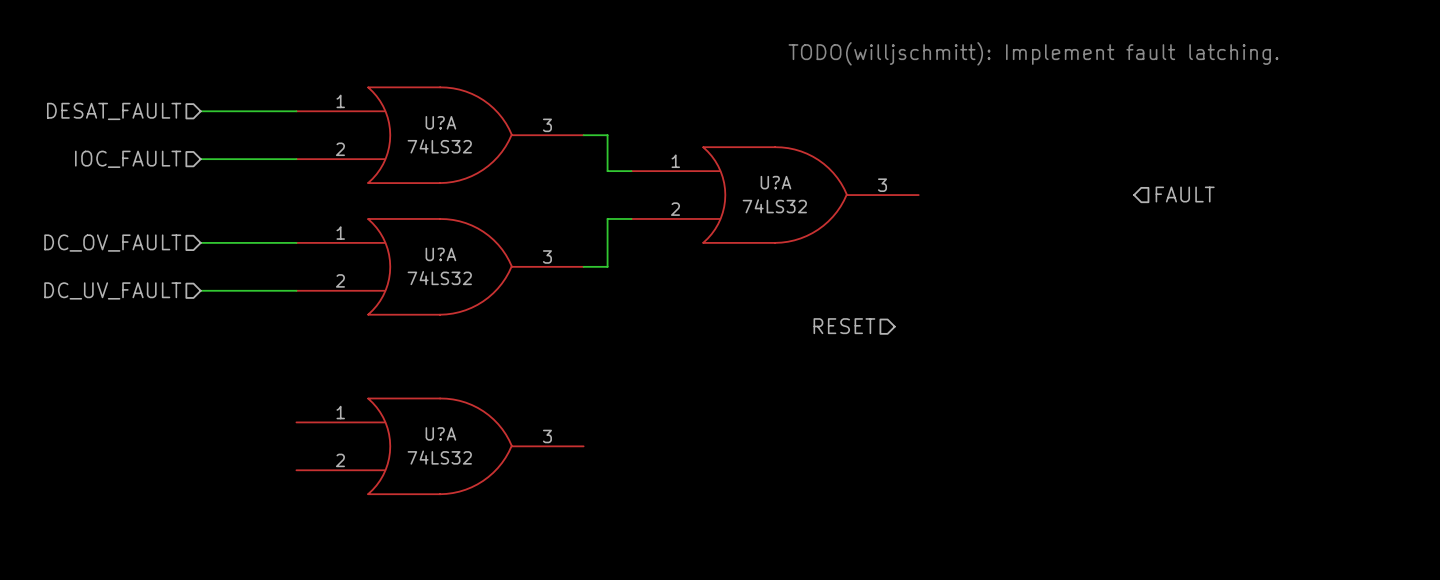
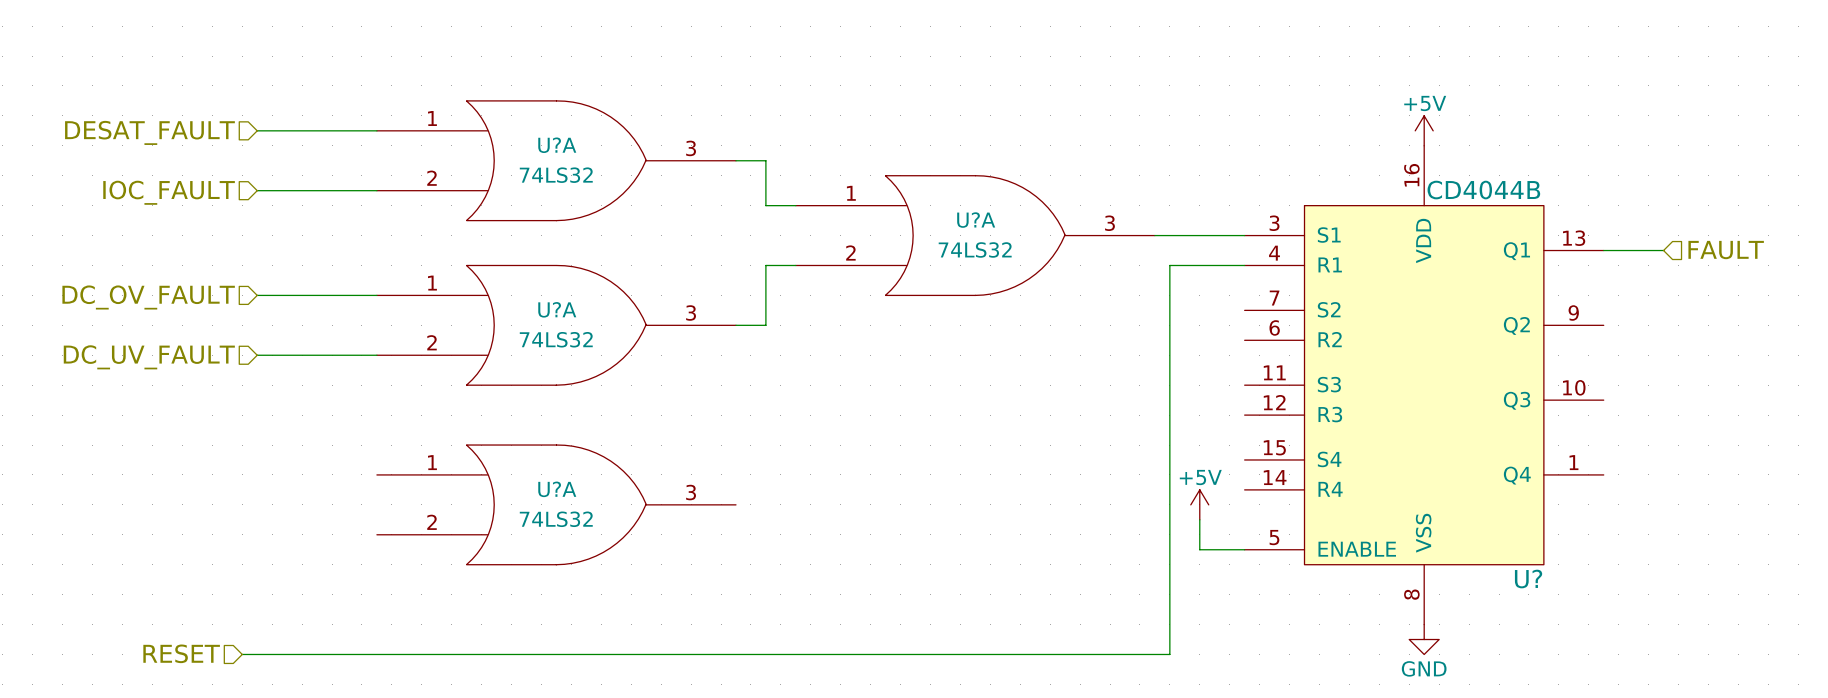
text: TODO(willjschmitt): Implement fault latching. (1033, 53) -> none
power symbol: none -> +5V (1424, 130)
hierarchical label position: FAULT (1185, 194) -> FAULT (1726, 250)
wire: none -> (1154, 235) (1244, 235)
wire: none -> (1603, 250) (1663, 250)
wire: none -> (1244, 265) (1169, 265) (1169, 654) (242, 654)
U?: none -> CD4044B (1424, 385)
hierarchical label: RESET (844, 326) -> none
power symbol: none -> +5V (1199, 504)
wire: none -> (1199, 519) (1199, 549) (1244, 549)
U?A position: (440, 446) -> (556, 504)
power symbol: none -> GND (1424, 639)
hierarchical label: none -> RESET (181, 653)

